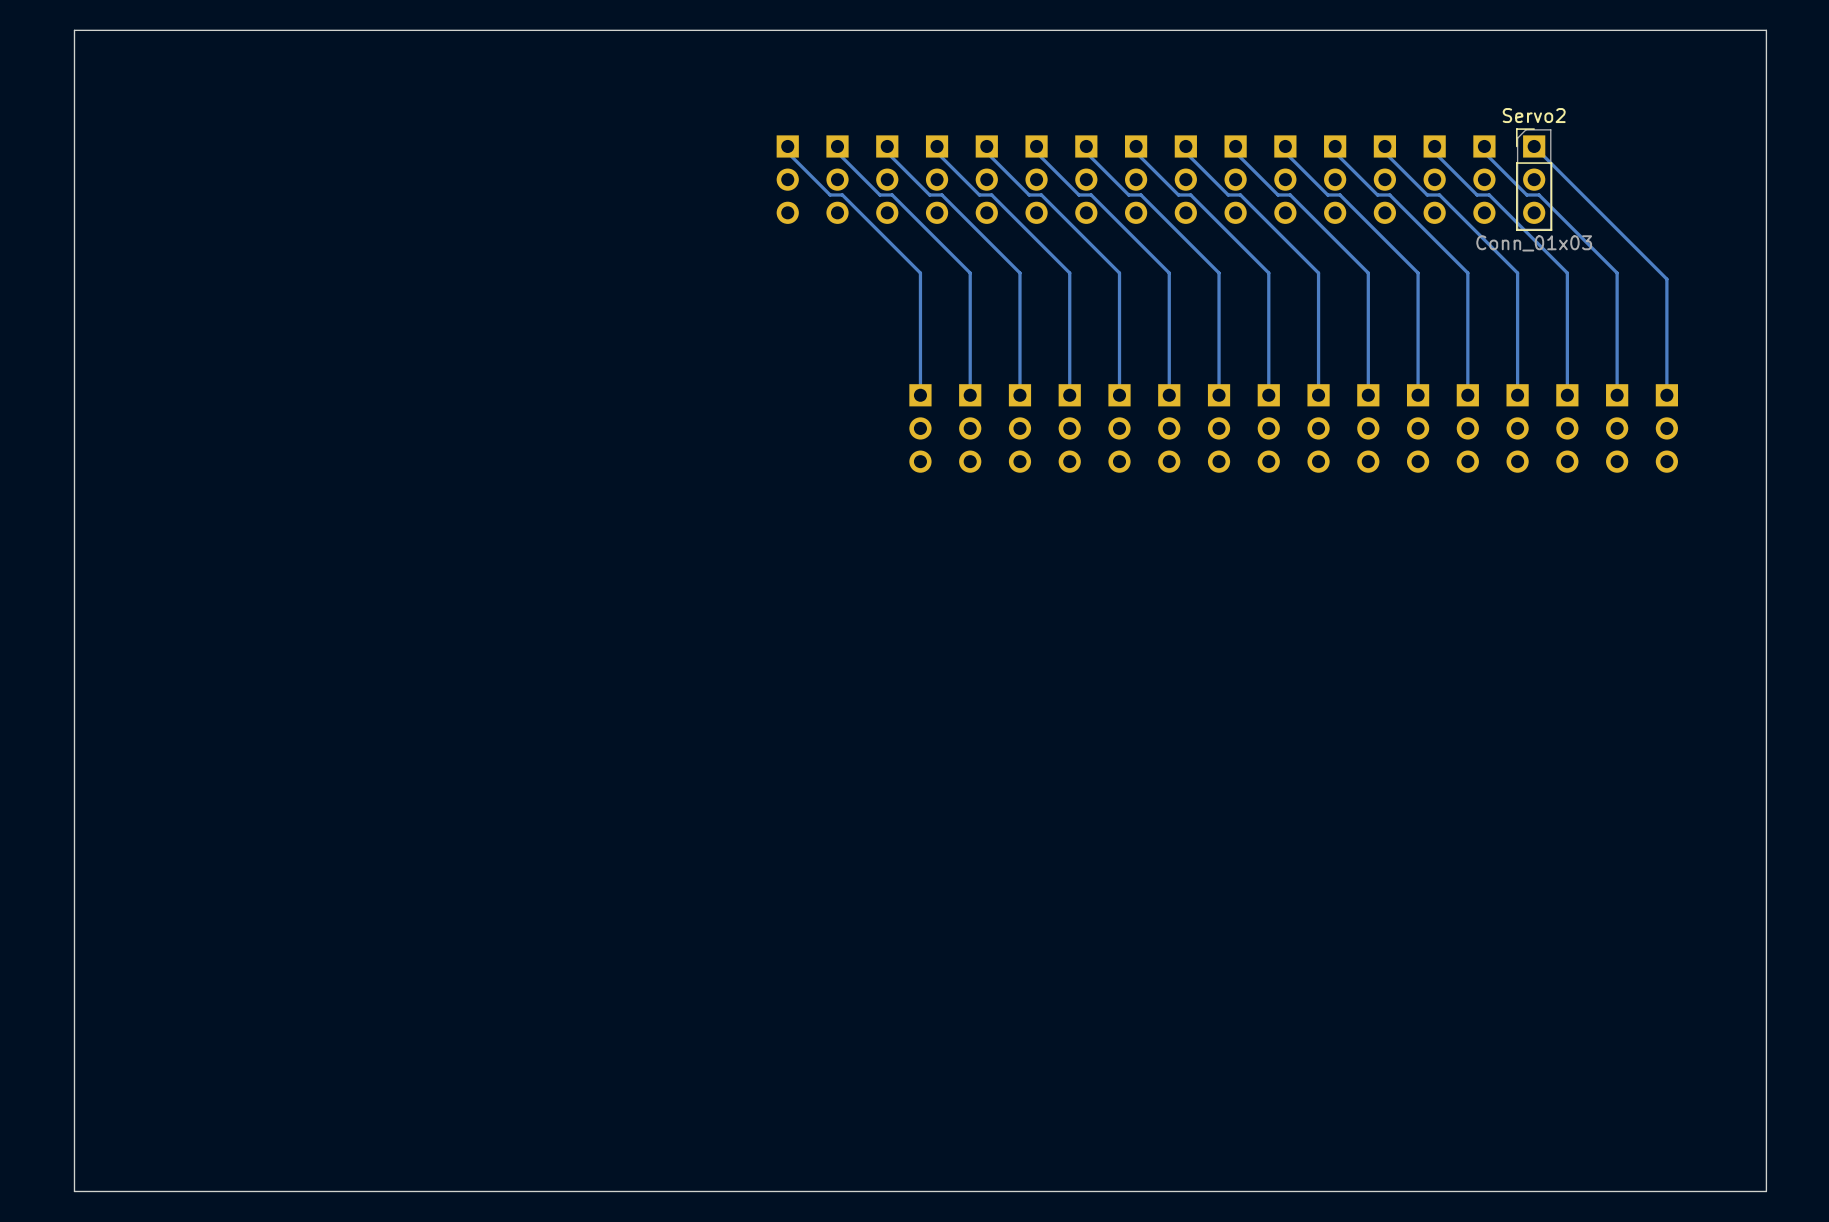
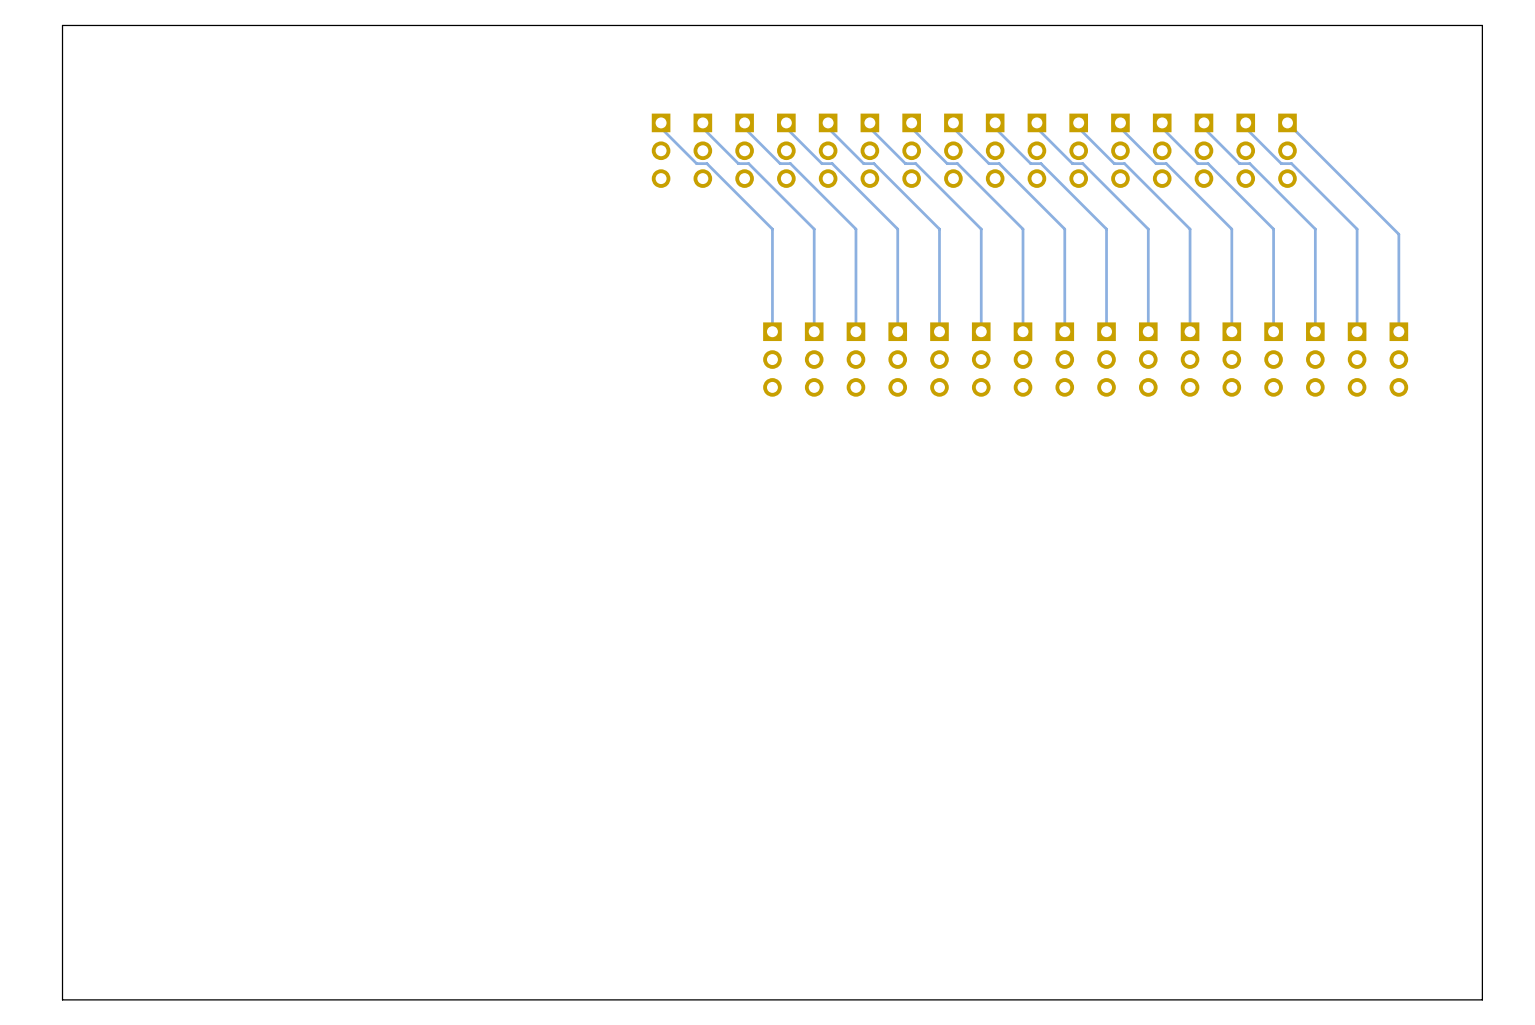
Servo2 side: bottom (1534, 179) -> top (1287, 150)

